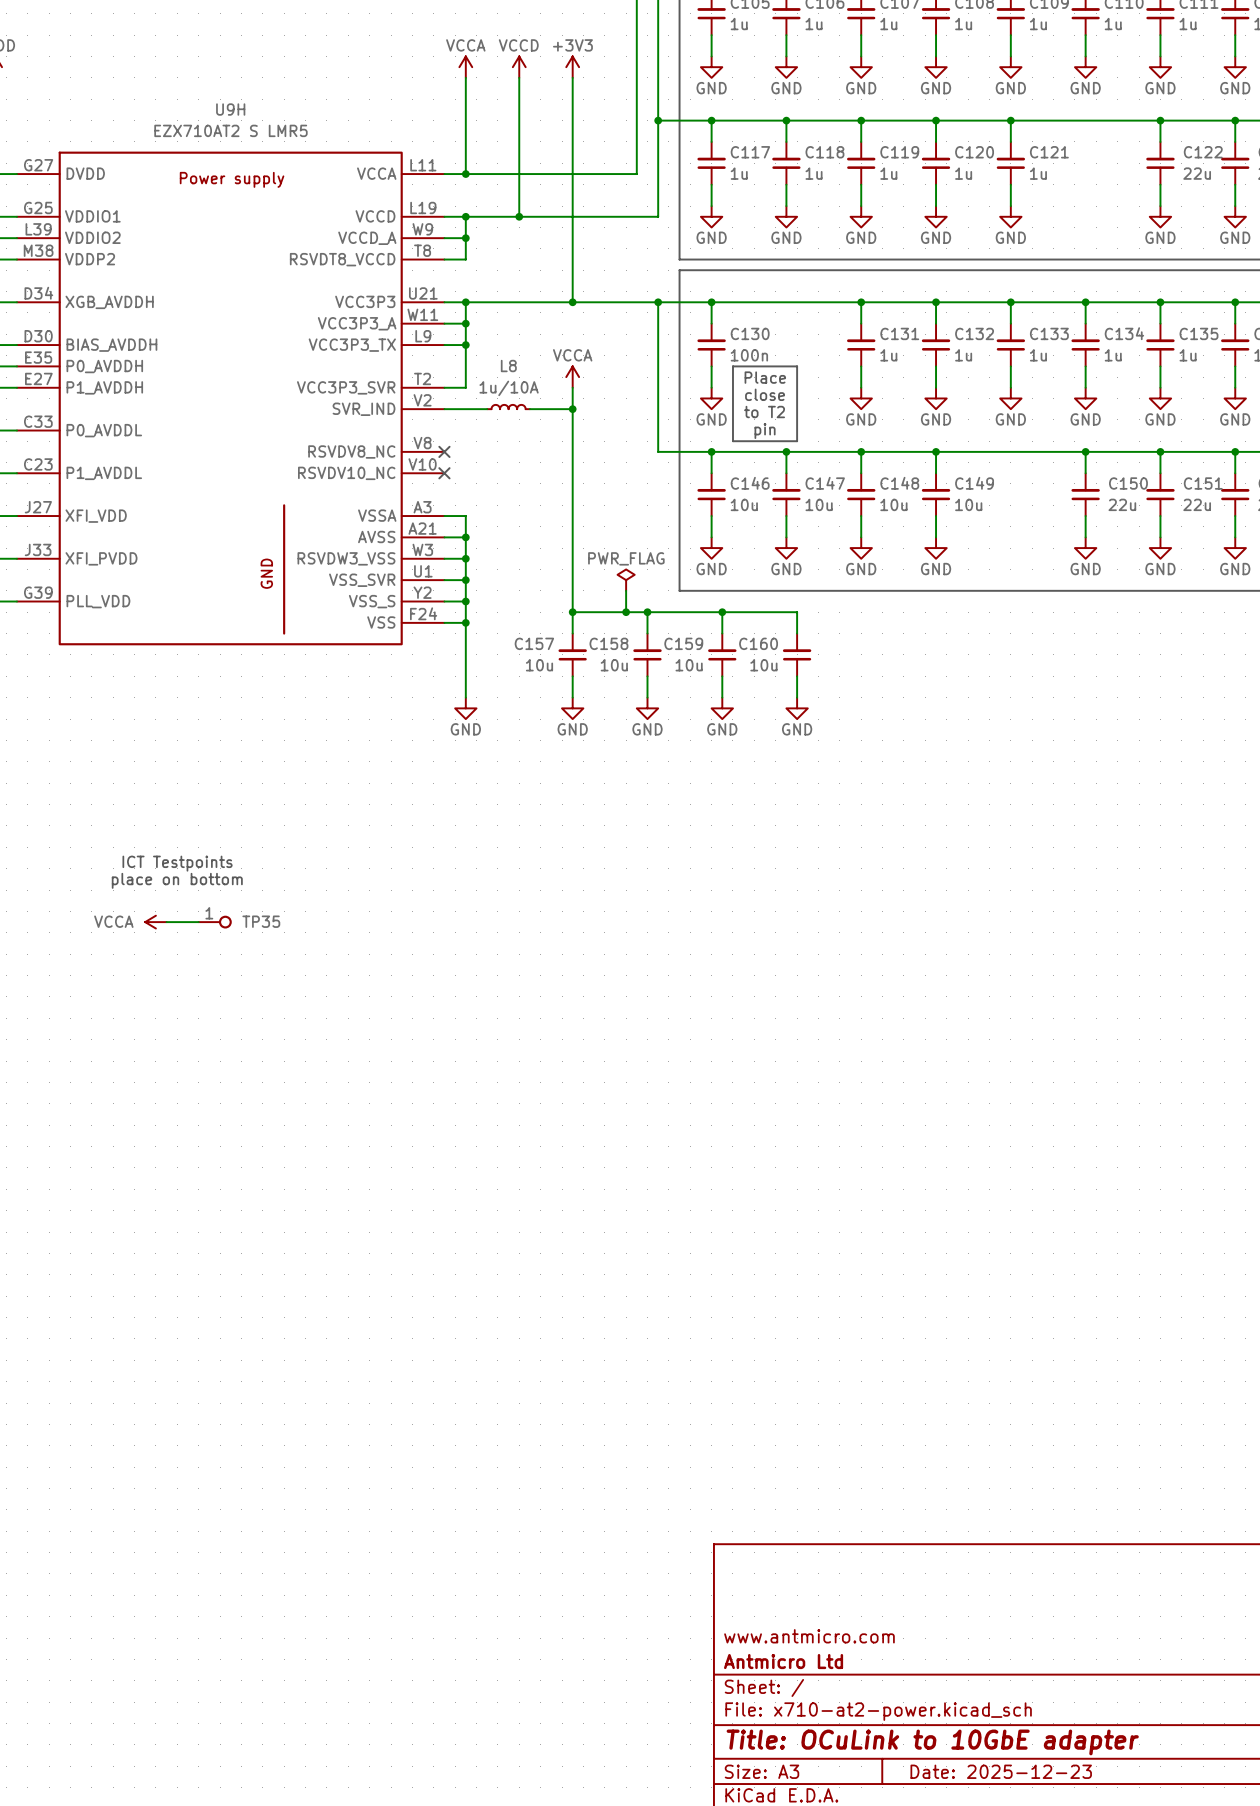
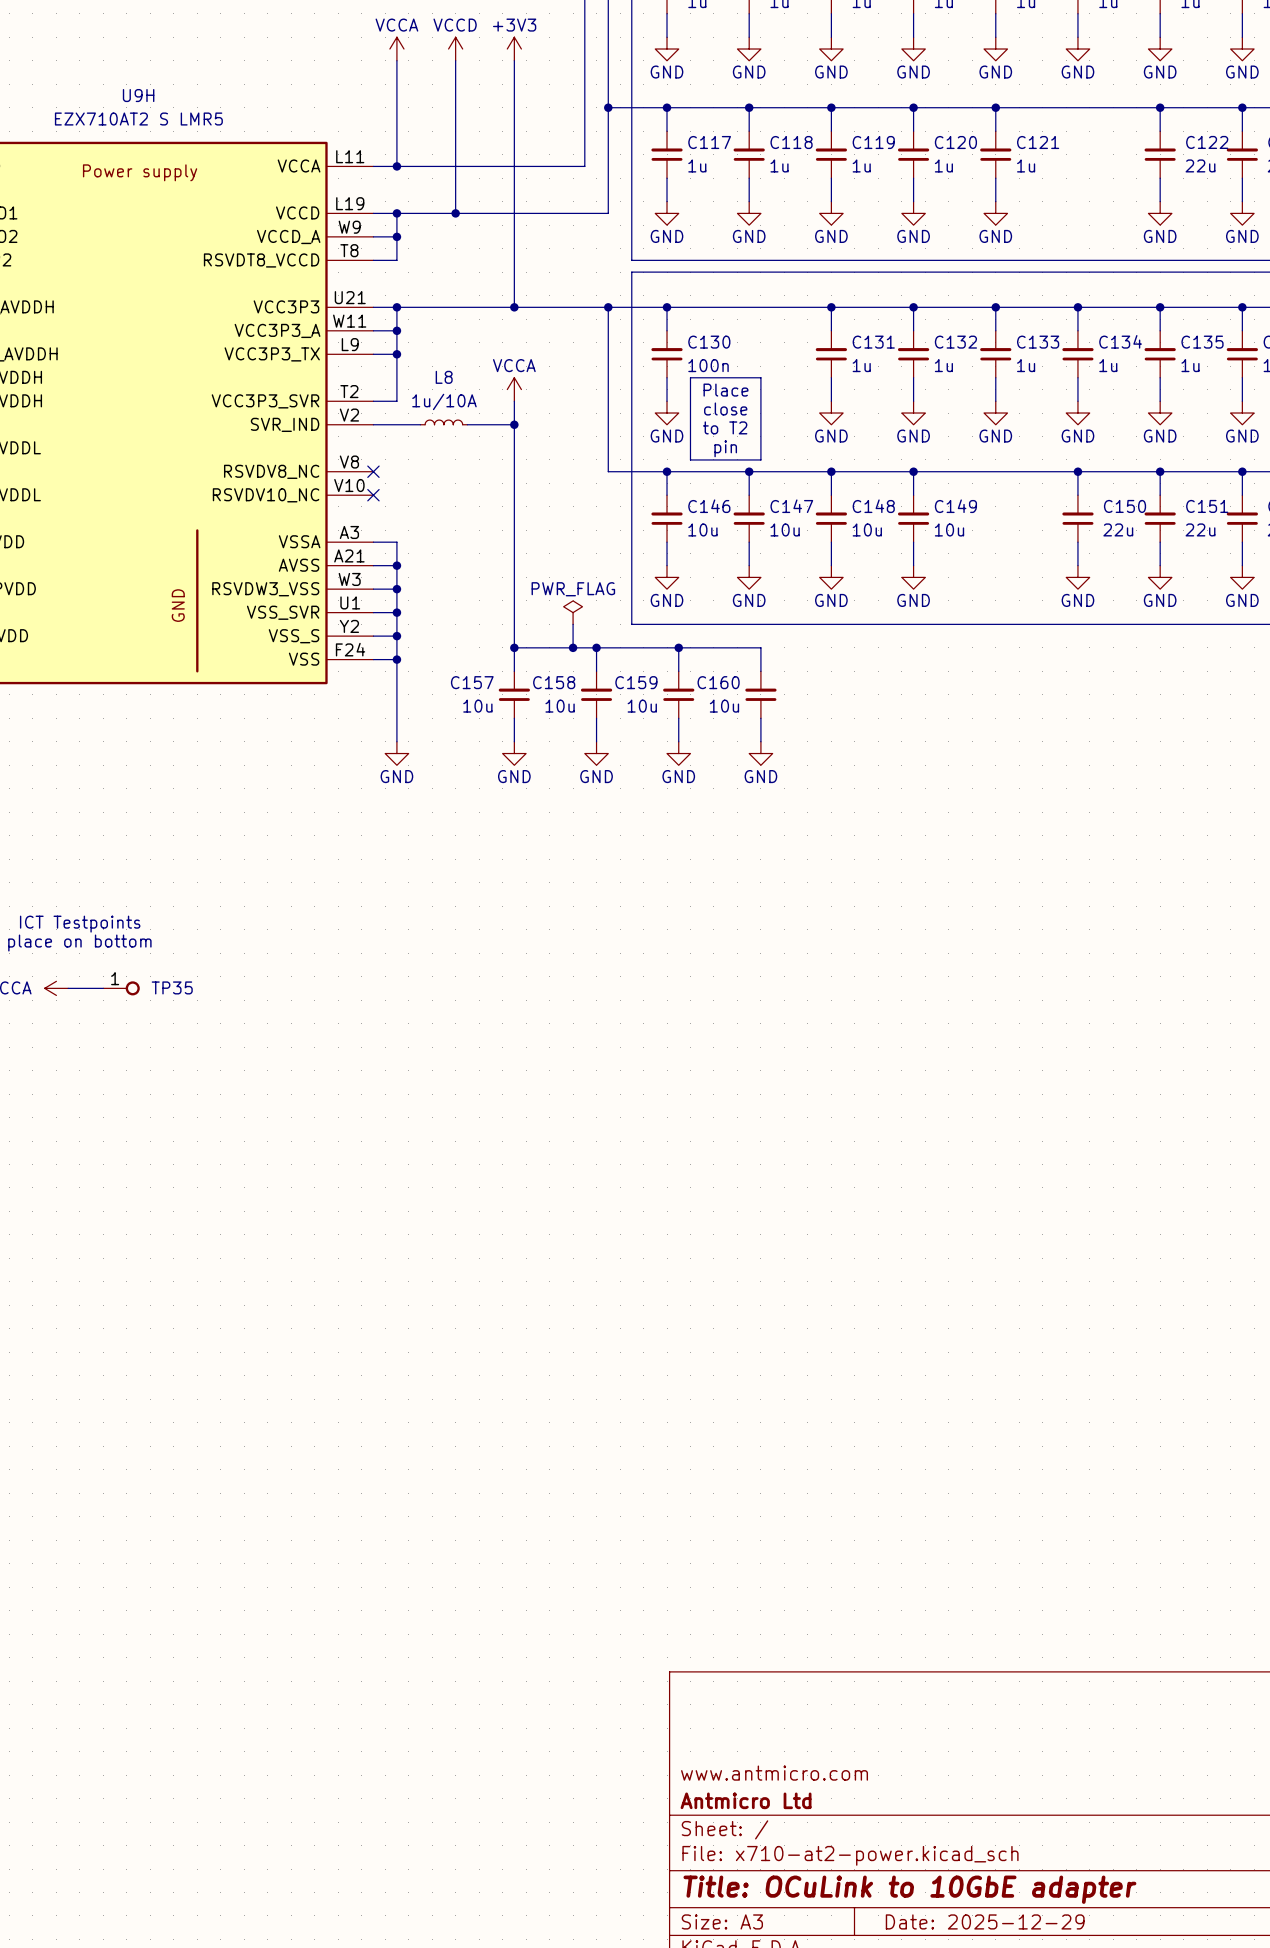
title block: Date: 2025-12-23 (1001, 1771) -> Date: 2025-12-29 (985, 1921)

